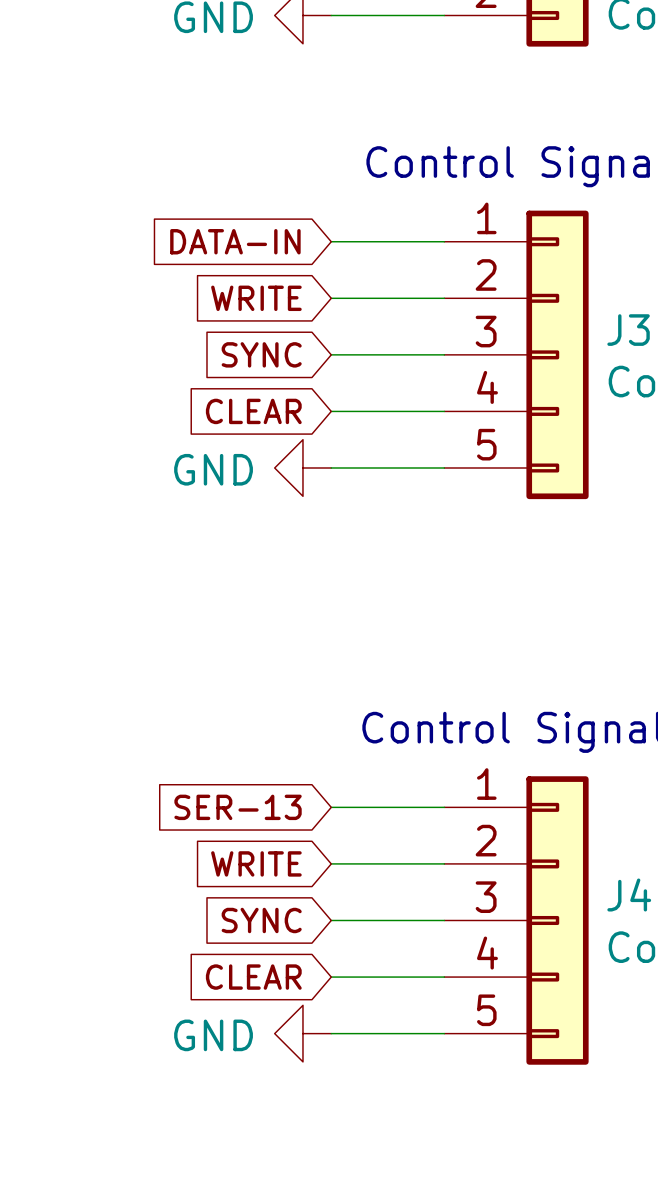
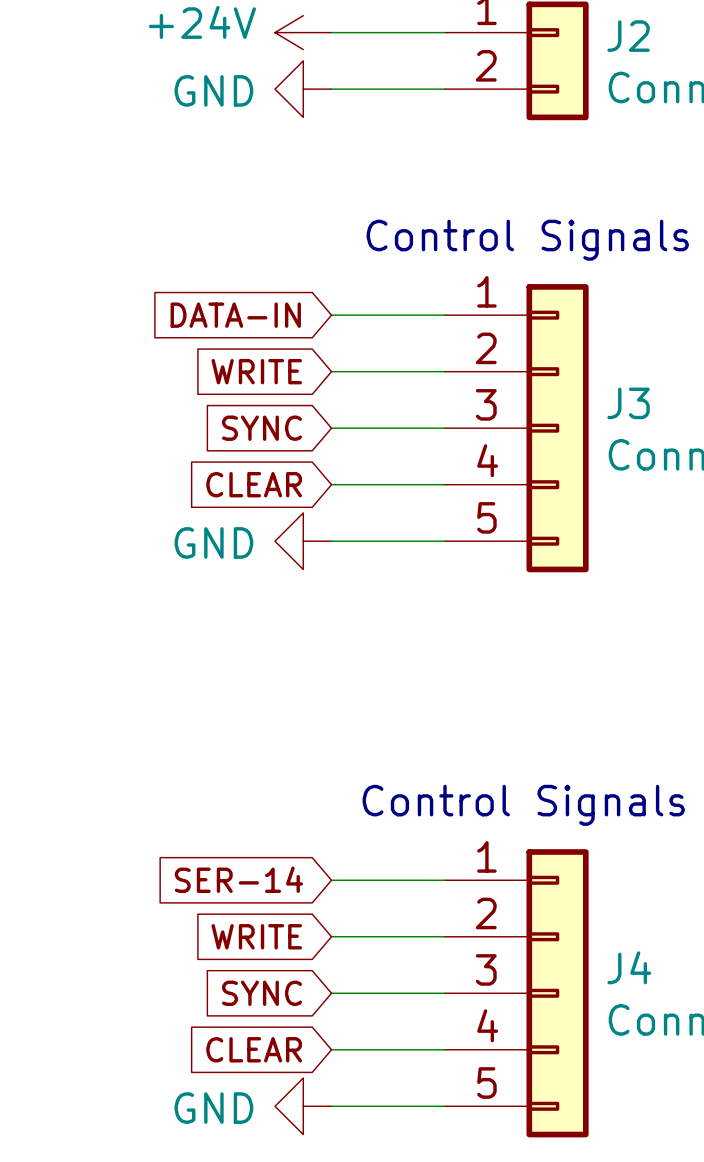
global label: SER-13 (238, 807) -> SER-14 (238, 879)

